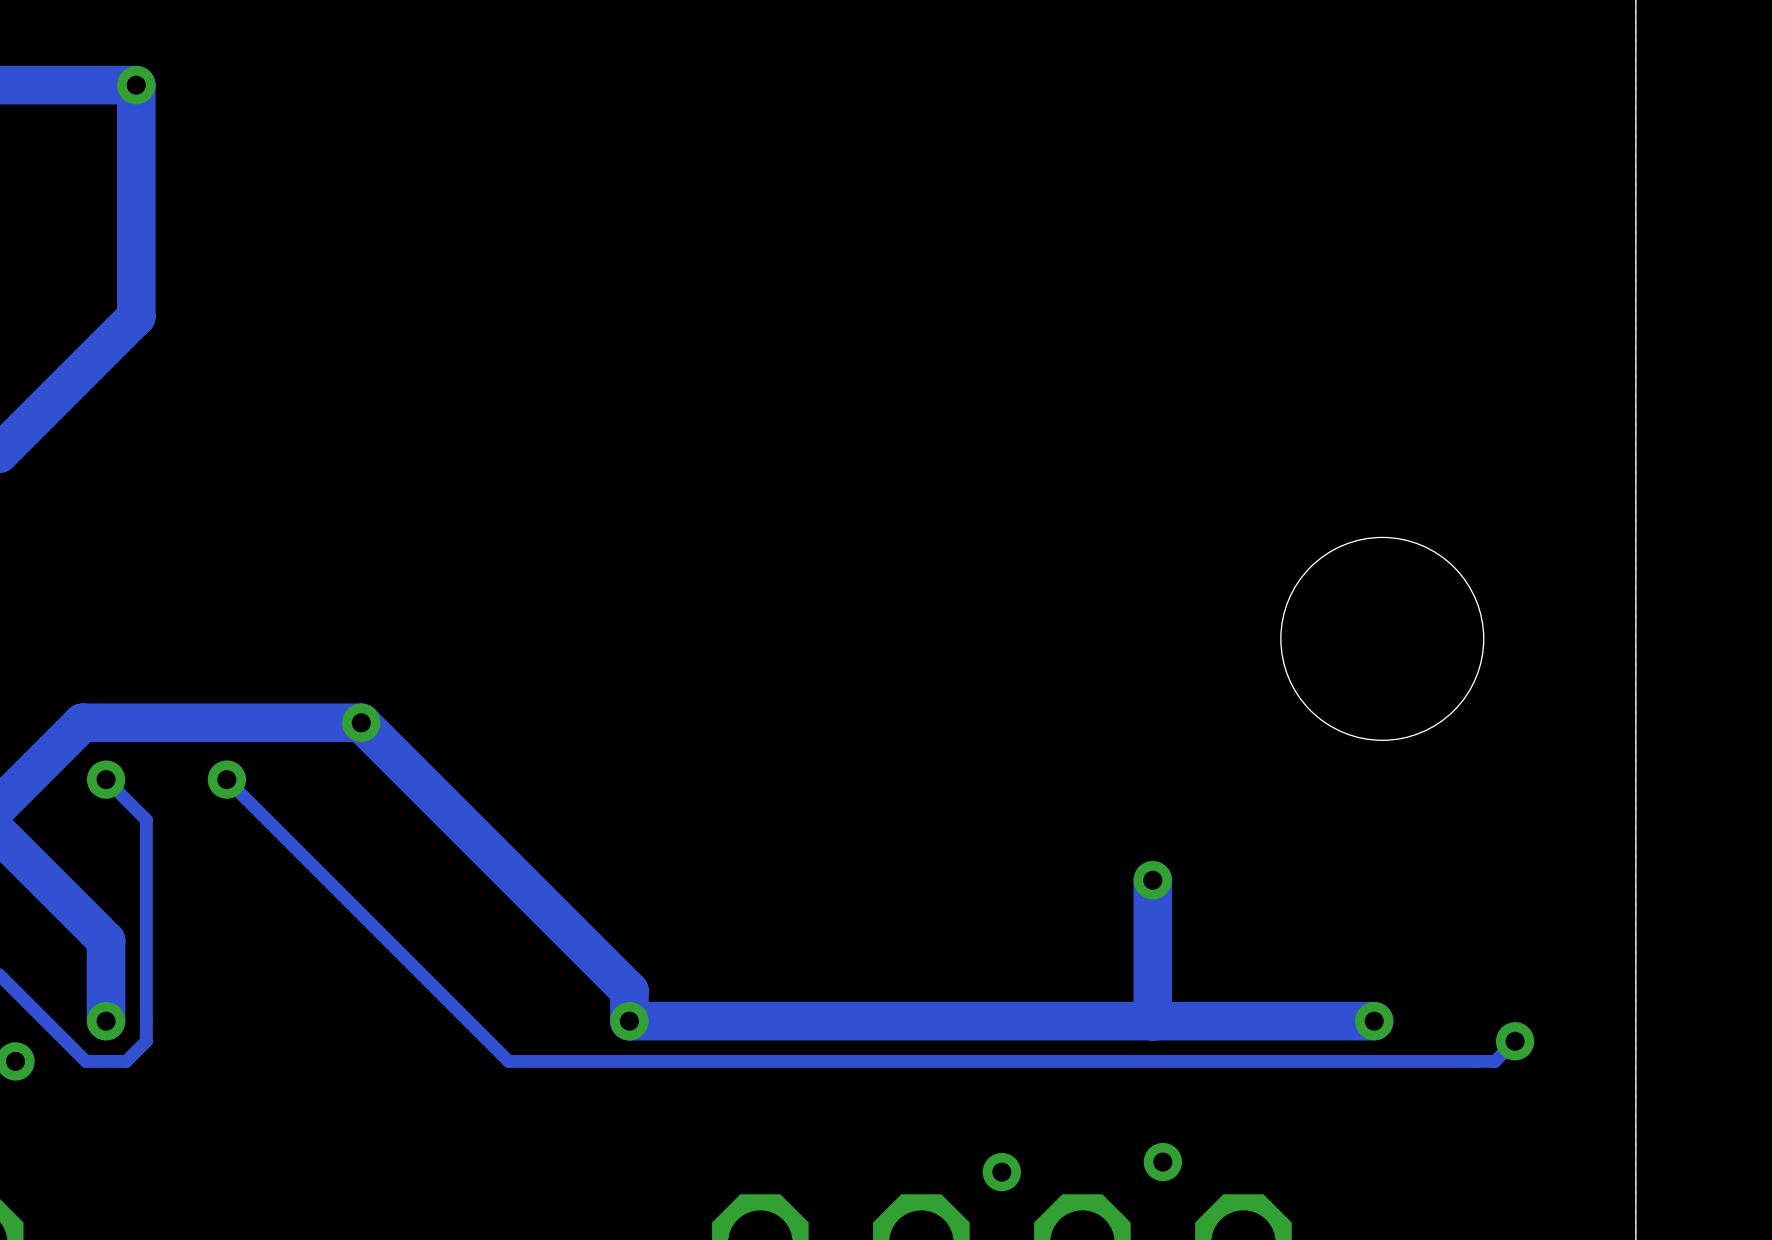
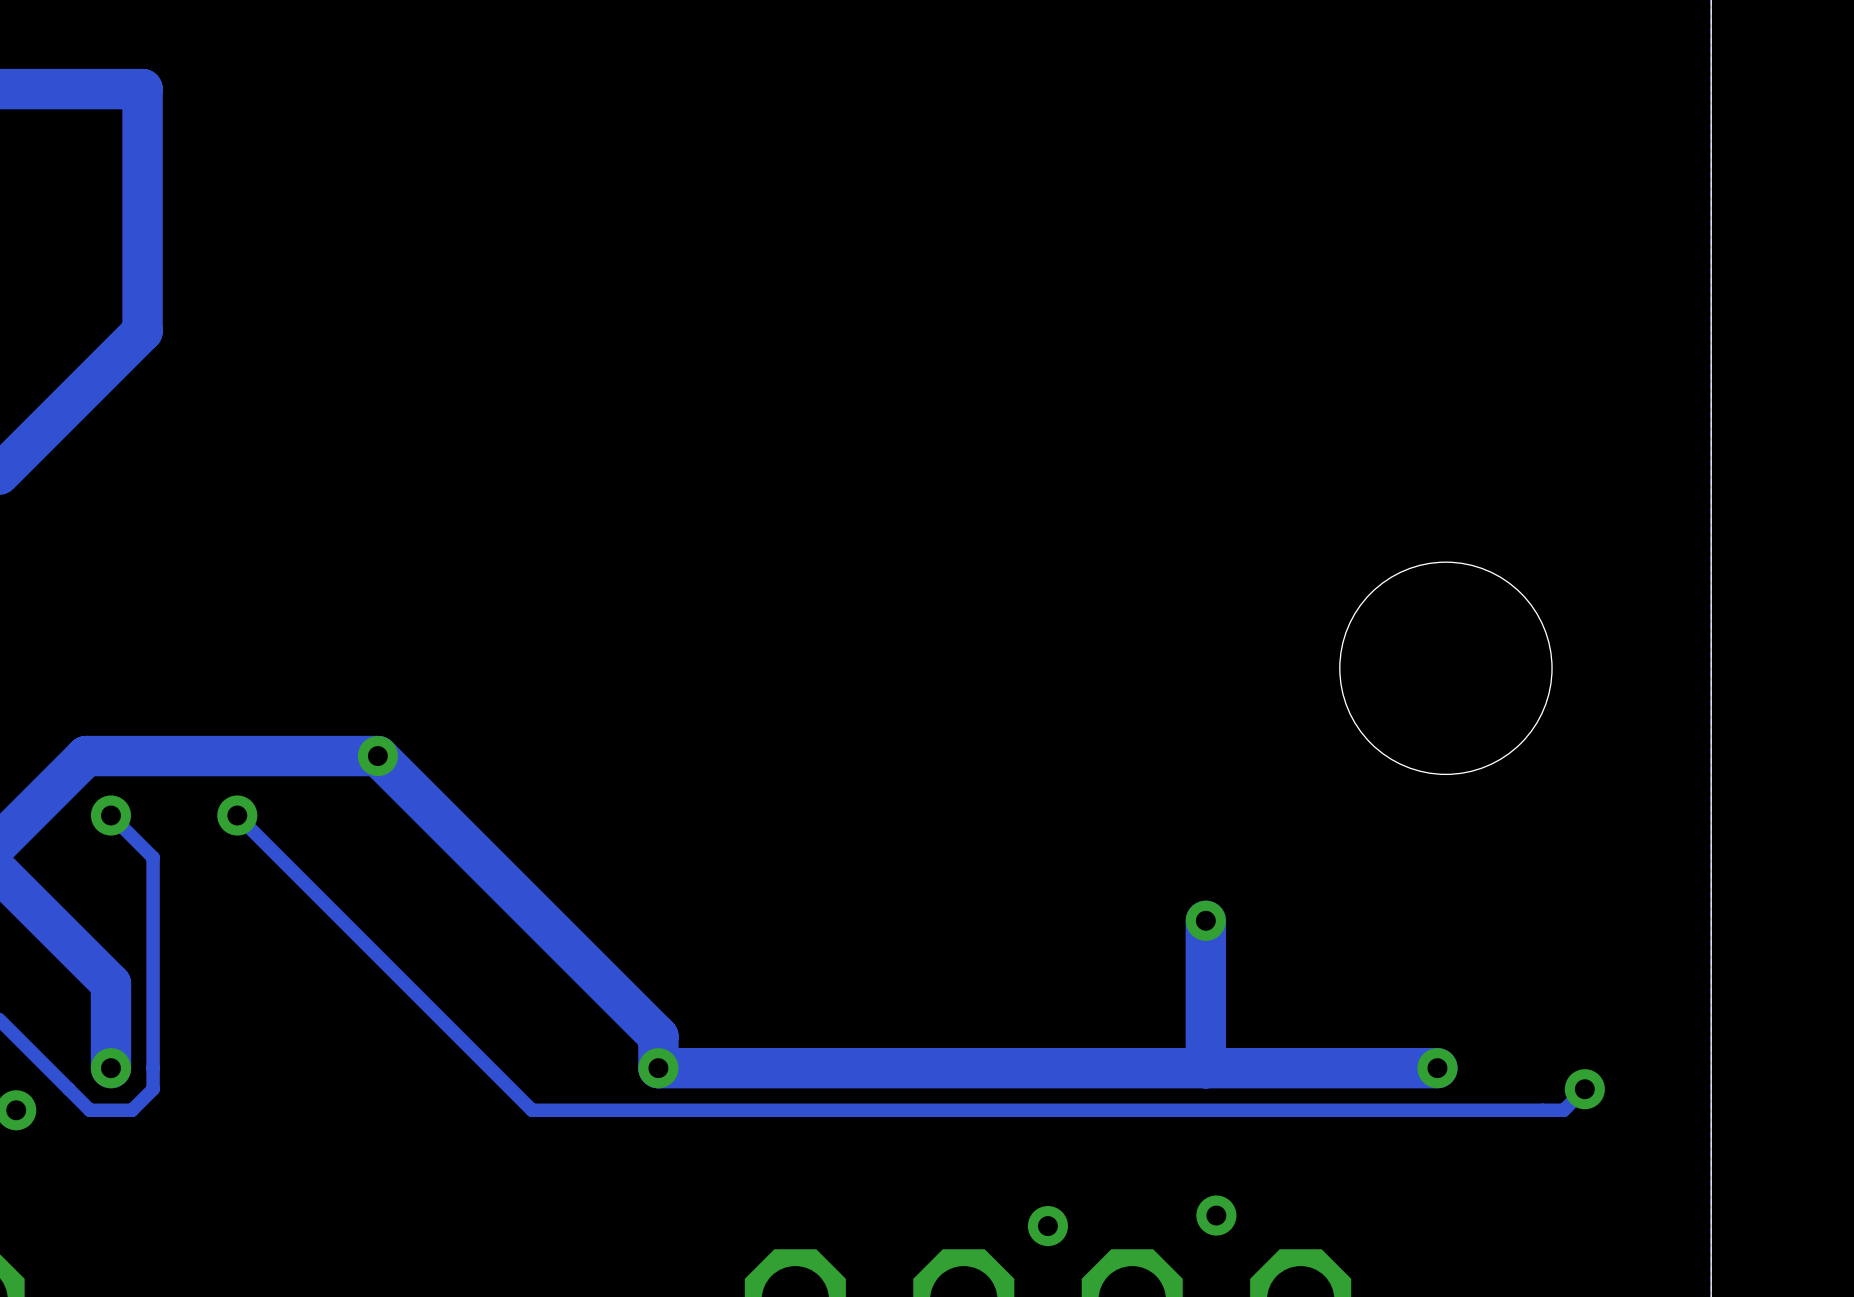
via: (136, 85) -> none

